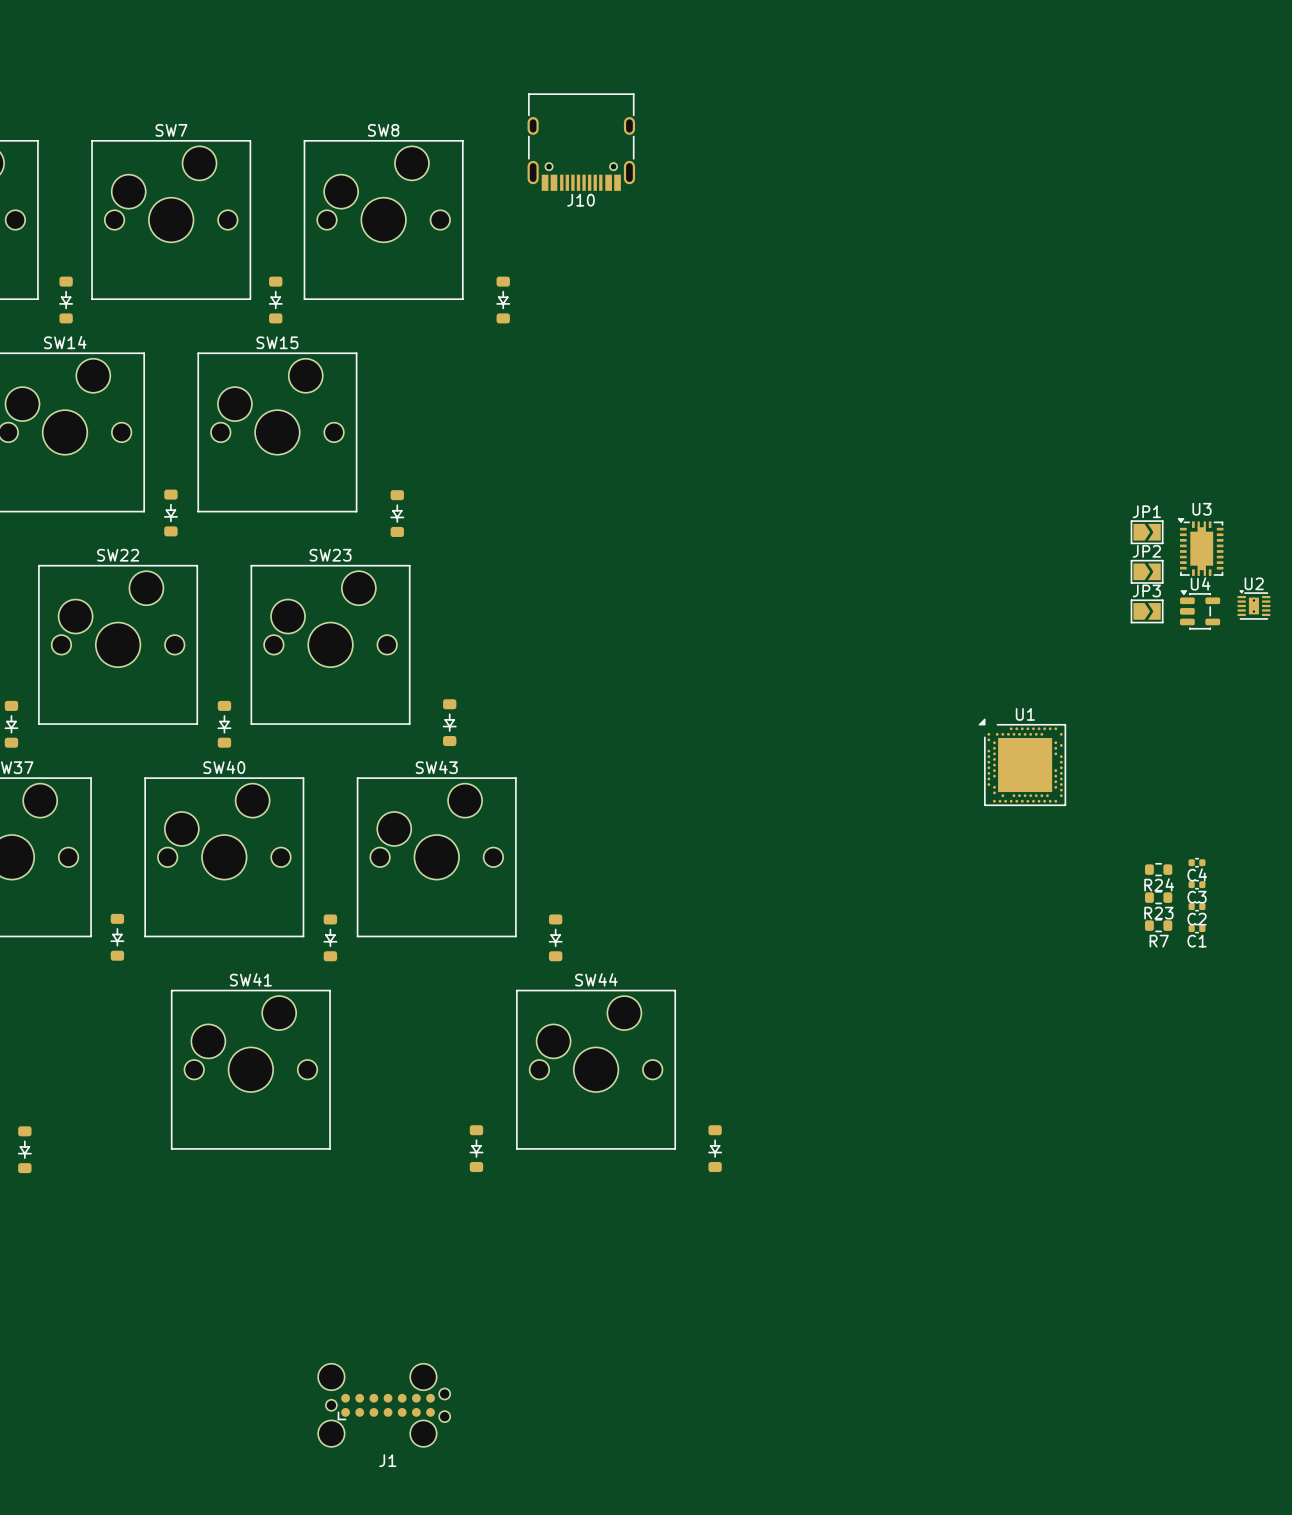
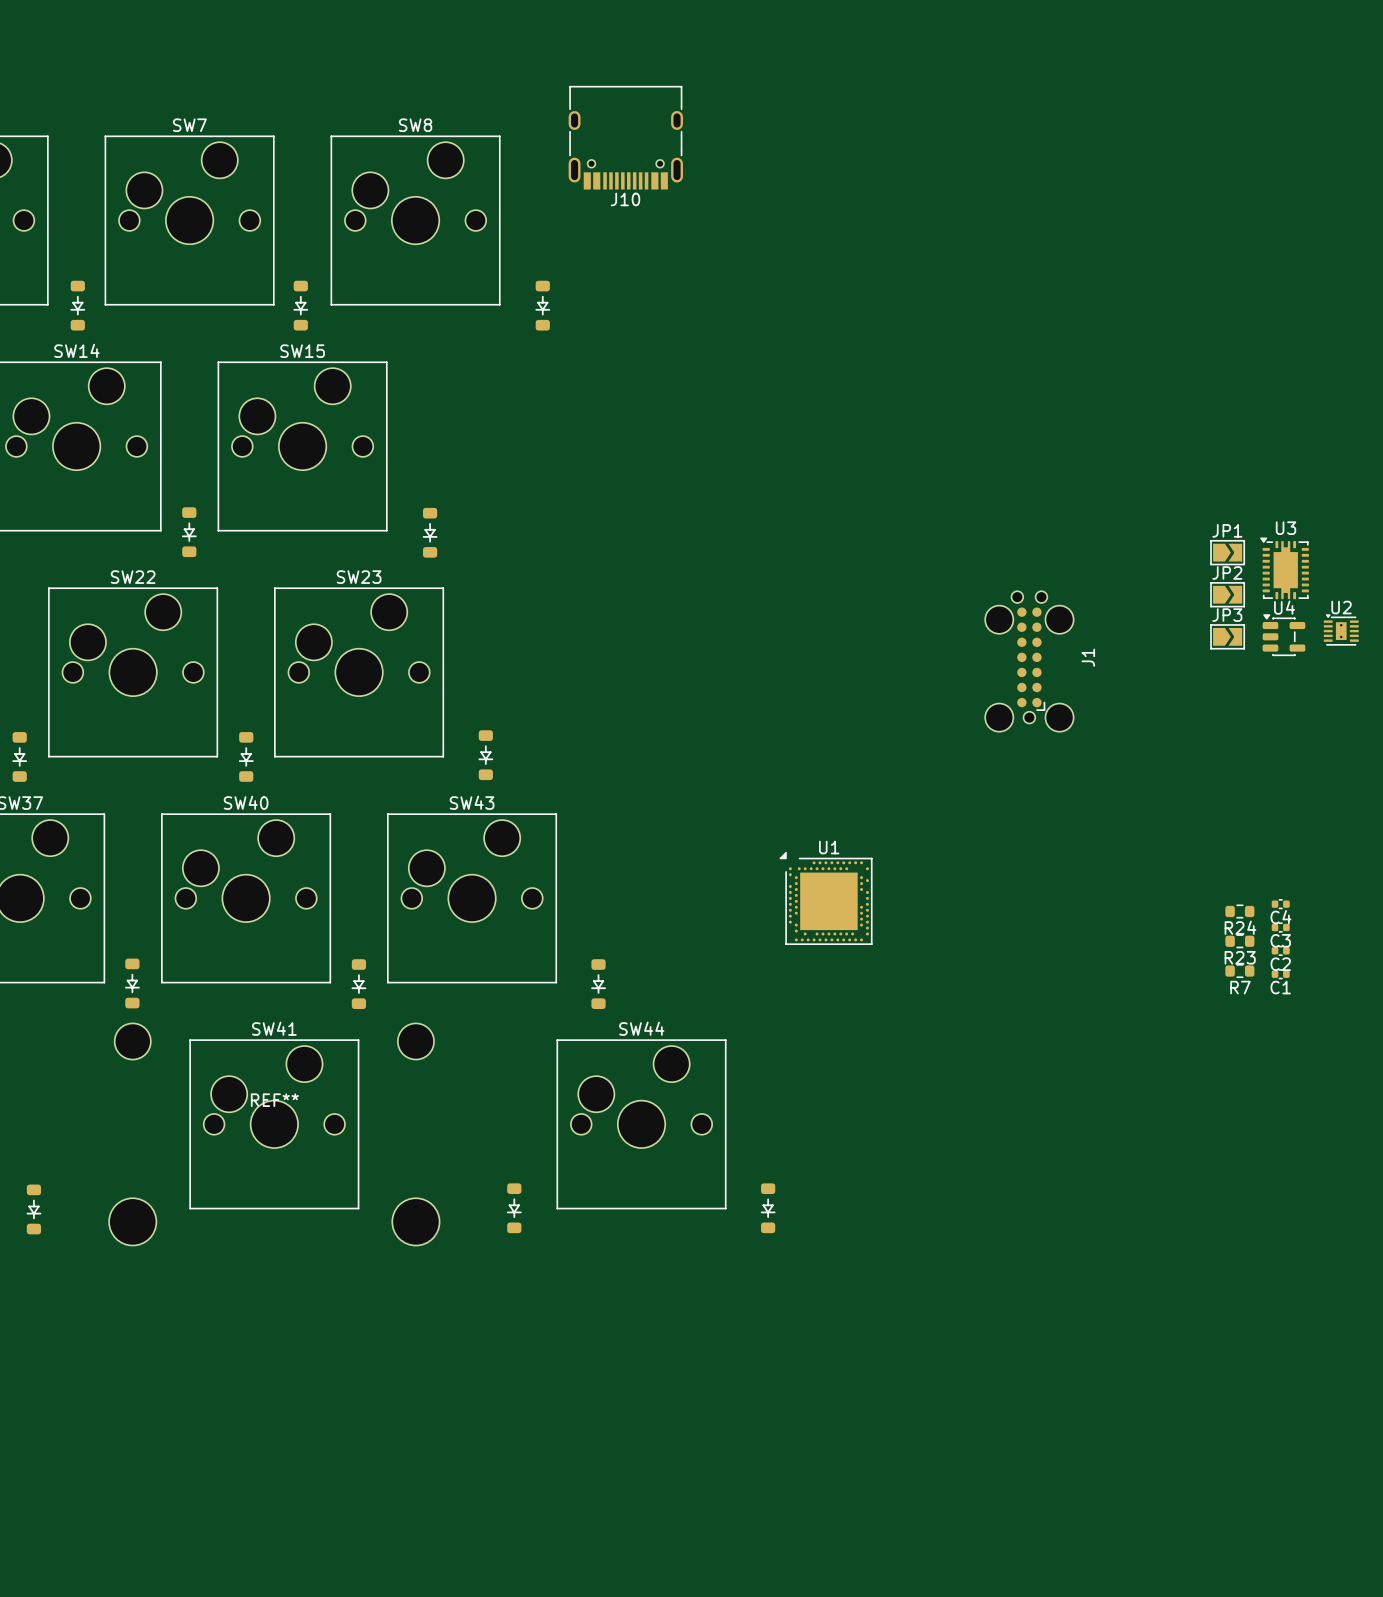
U1 position: (1022, 762) -> (825, 898)
REF**: none -> (274, 1134)
J1 rotation: 0° (384, 1405) -> 90° counterclockwise (1029, 661)
J1 position: (384, 1405) -> (1029, 661)

